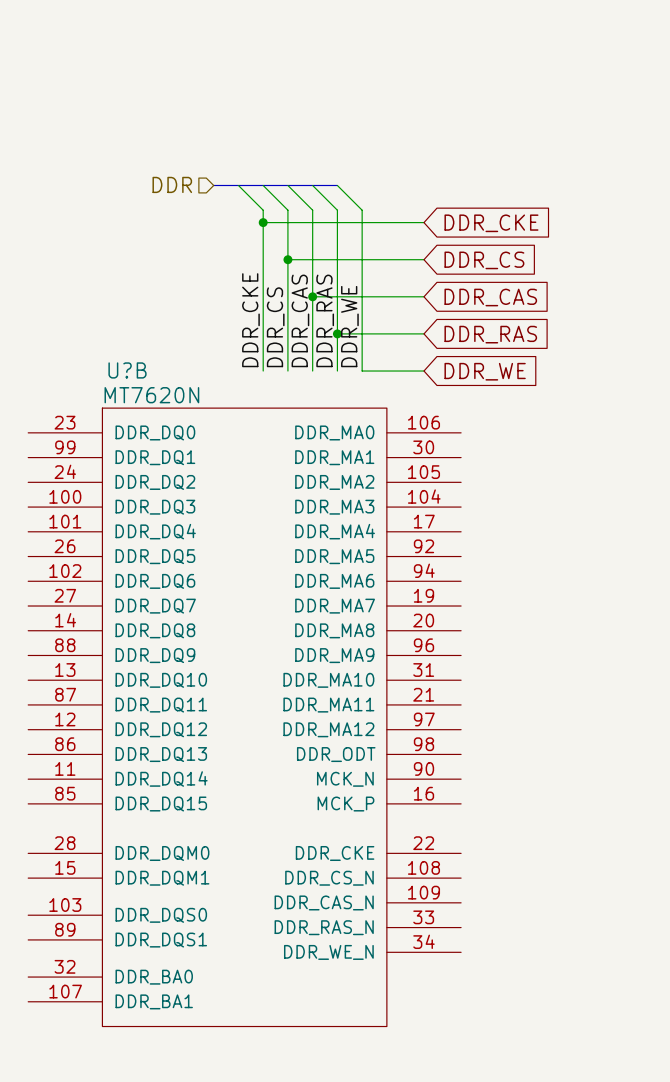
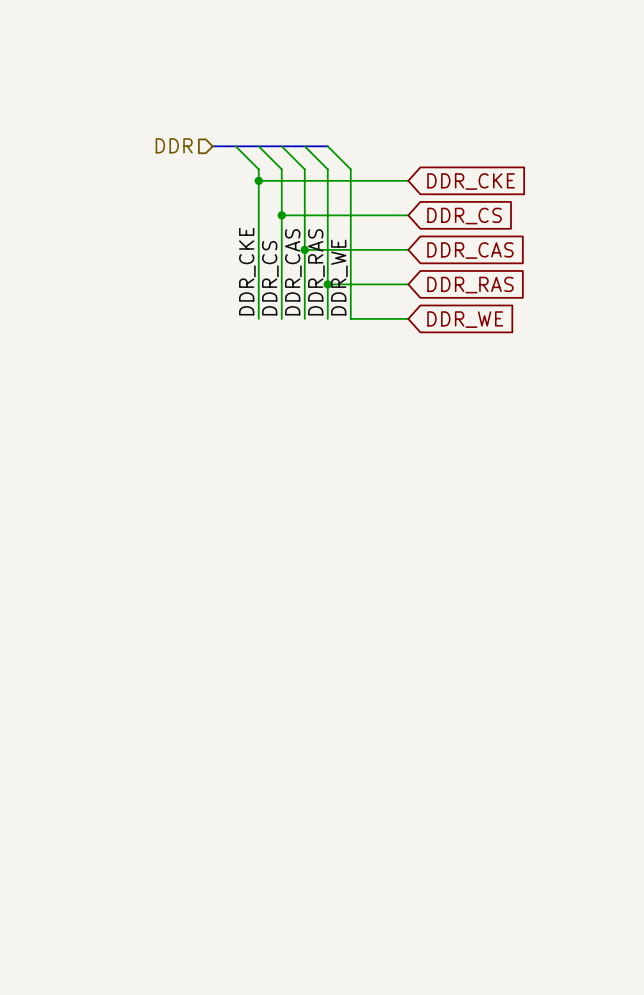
U?B: MT7620N (244, 717) -> none

